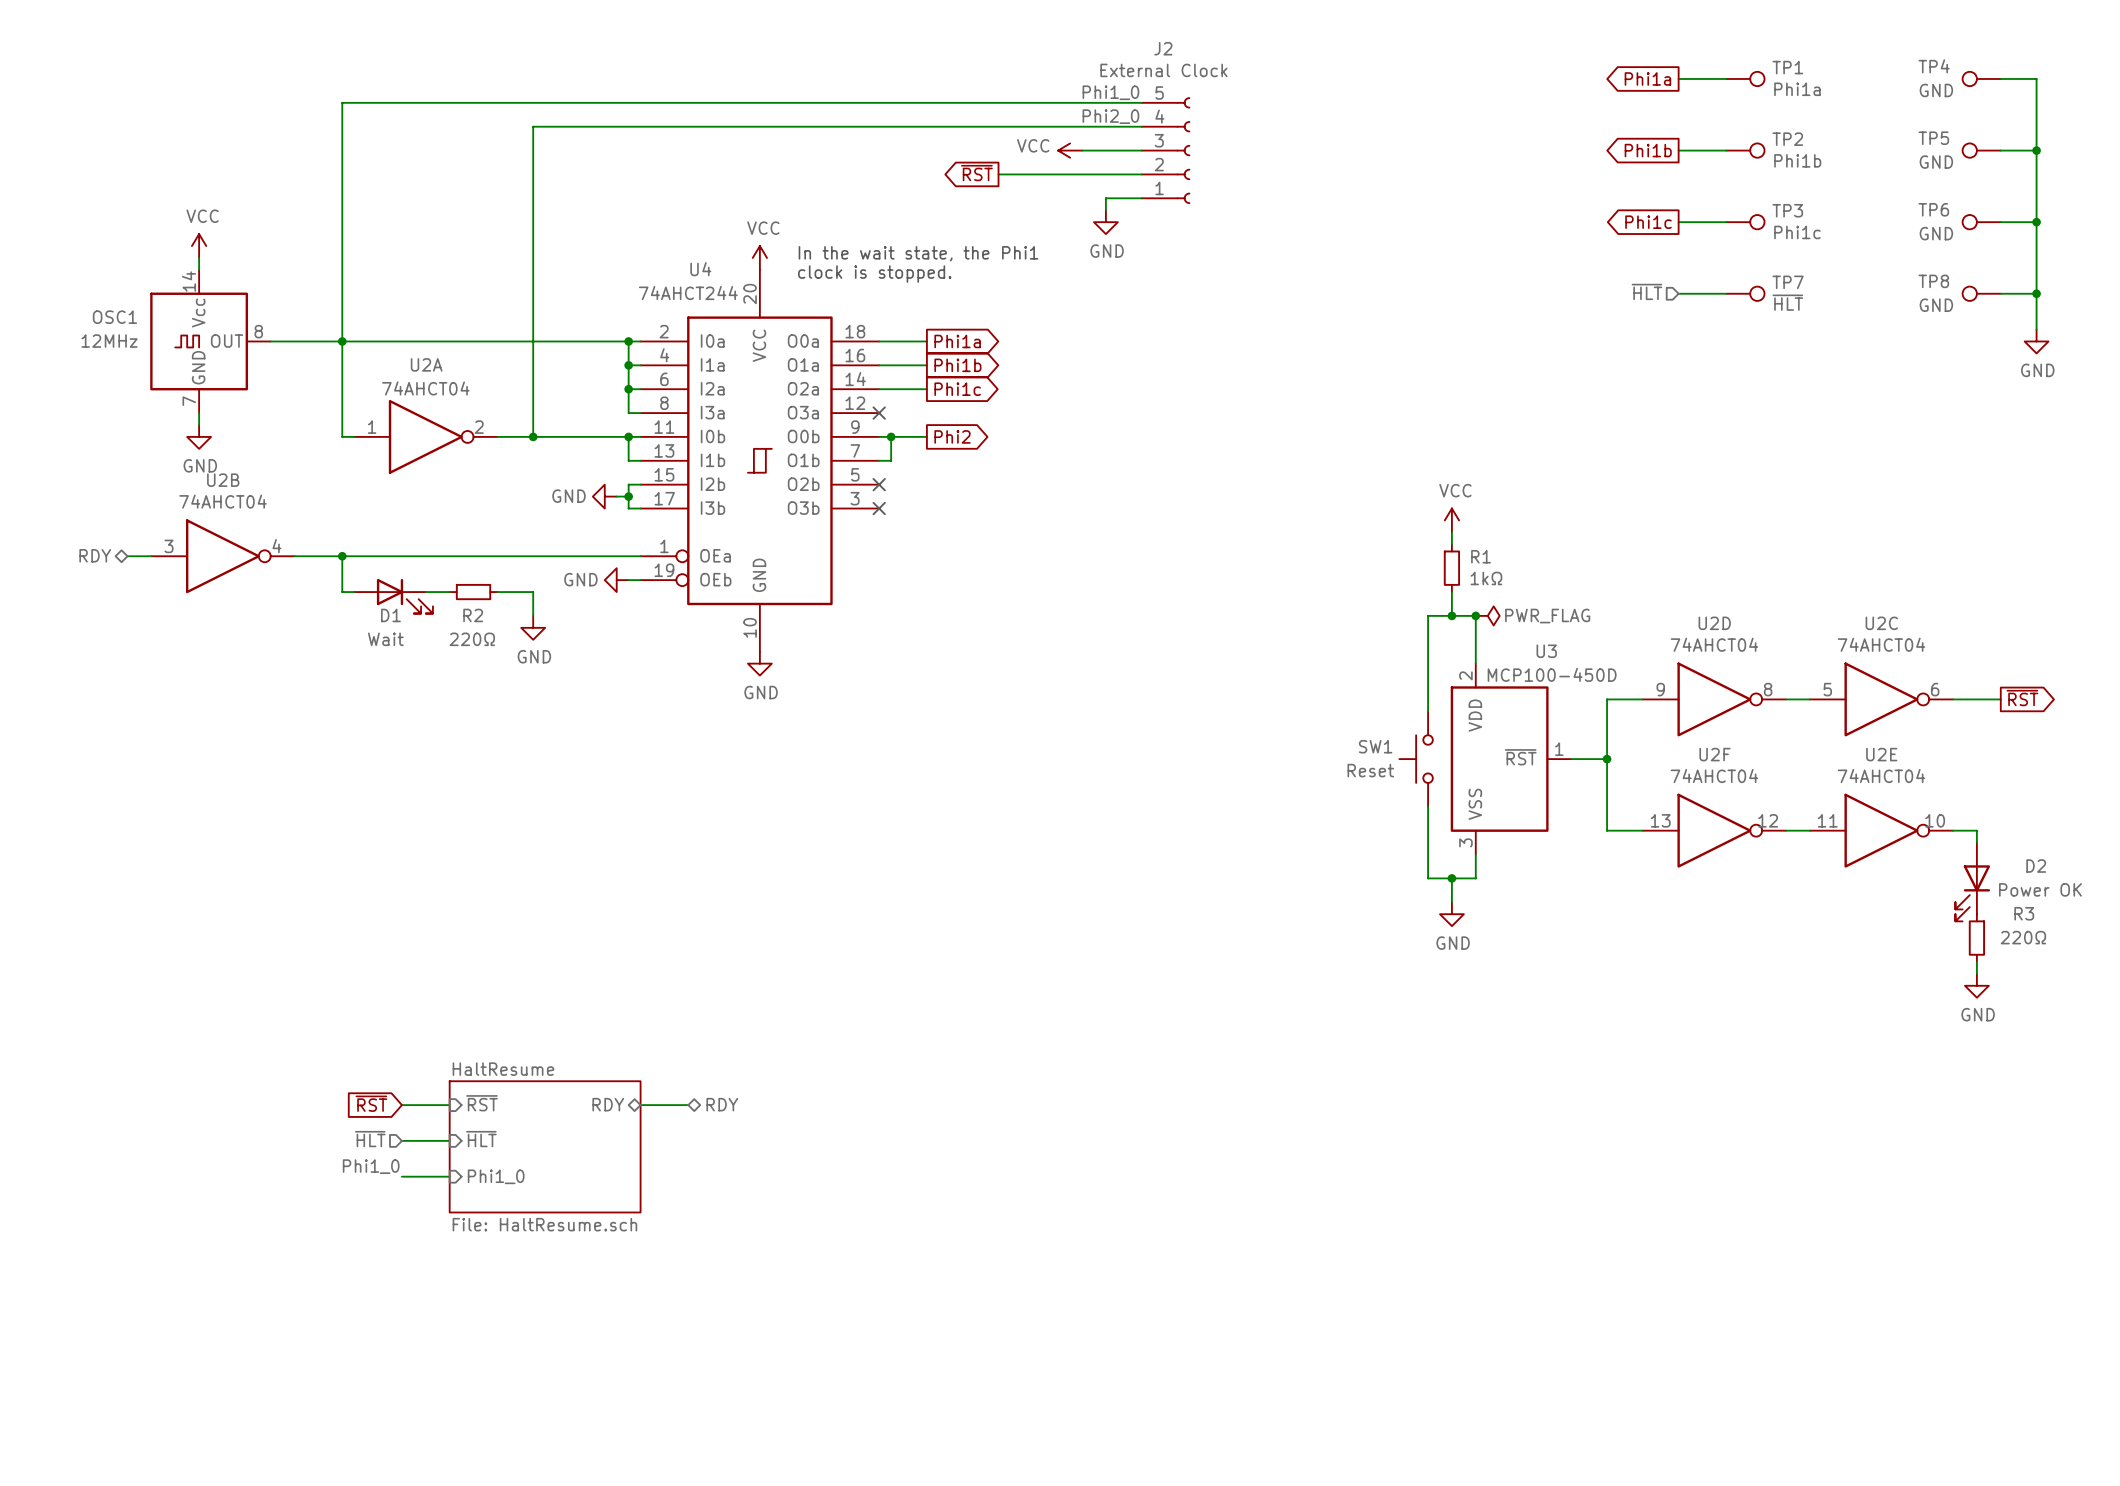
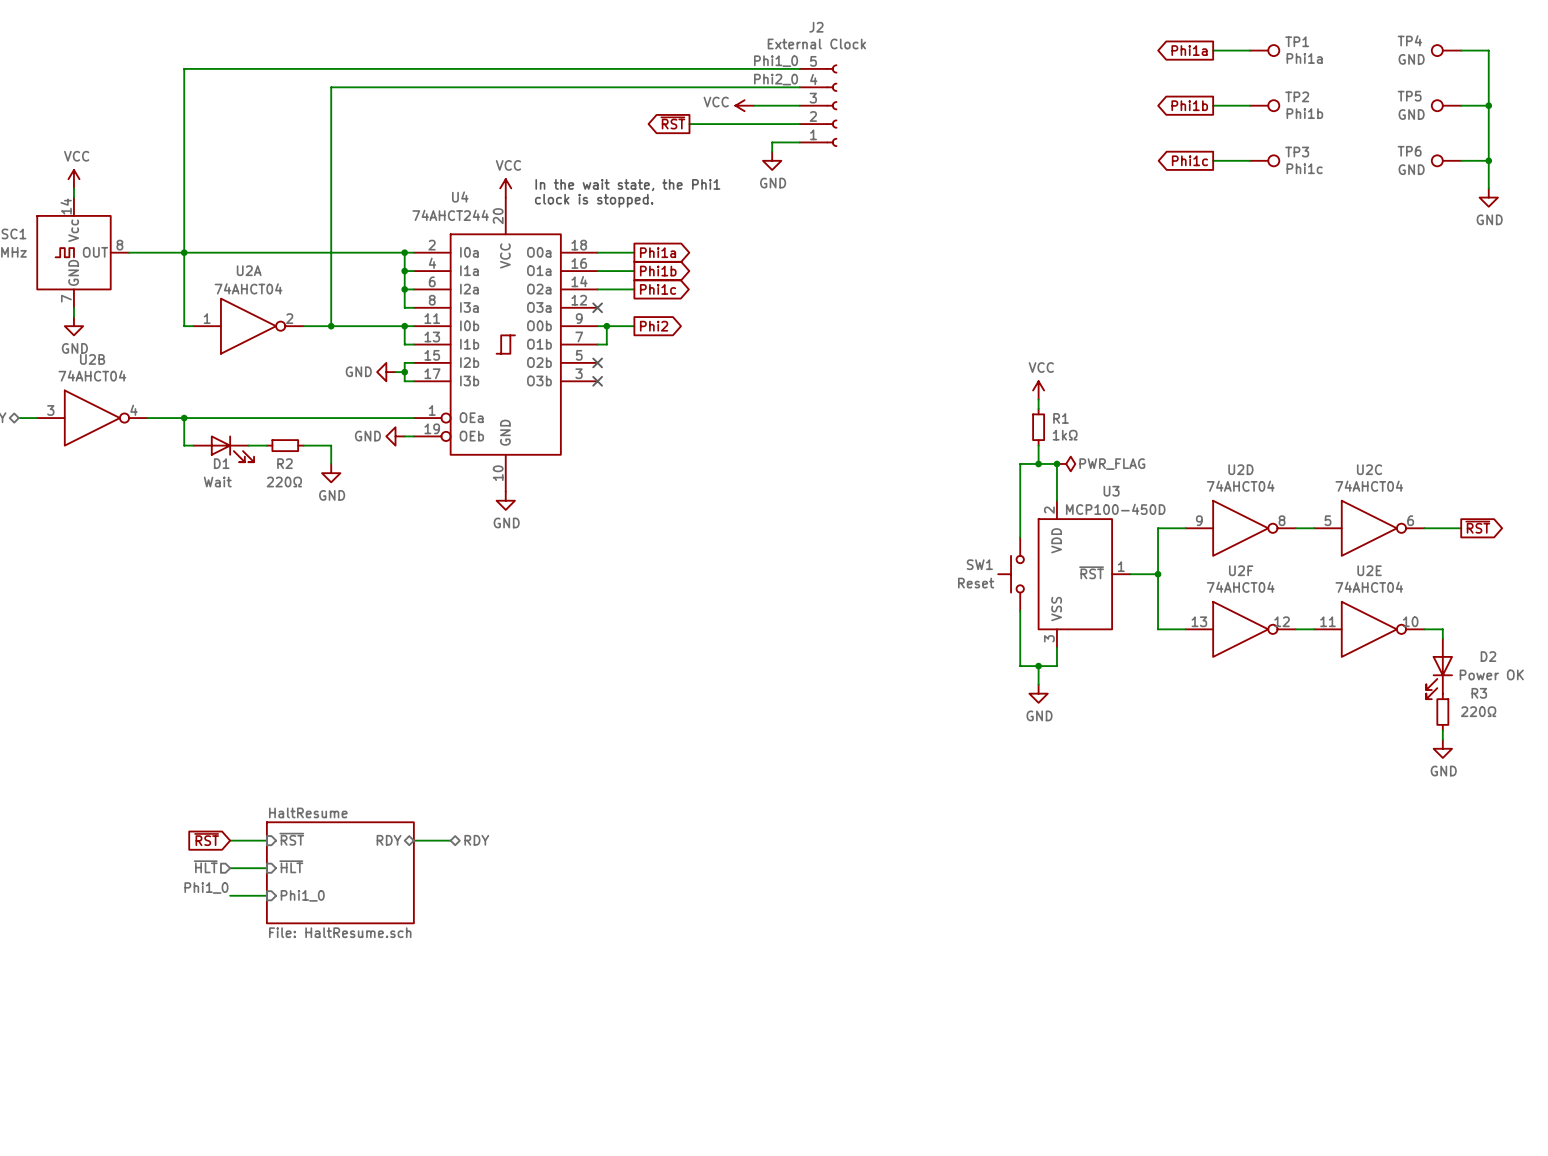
wire: (2036, 257) (2036, 329) -> none
hierarchical label: ~{HLT} (1646, 291) -> none
wire: (1678, 293) (1726, 293) -> none
TP7: ~{HLT} (1745, 293) -> none
TP8: GND (1981, 293) -> none
wire: (2000, 293) (2036, 293) -> none
junction: (2036, 293) -> none
power symbol position: GND (2036, 341) -> GND (1488, 197)

